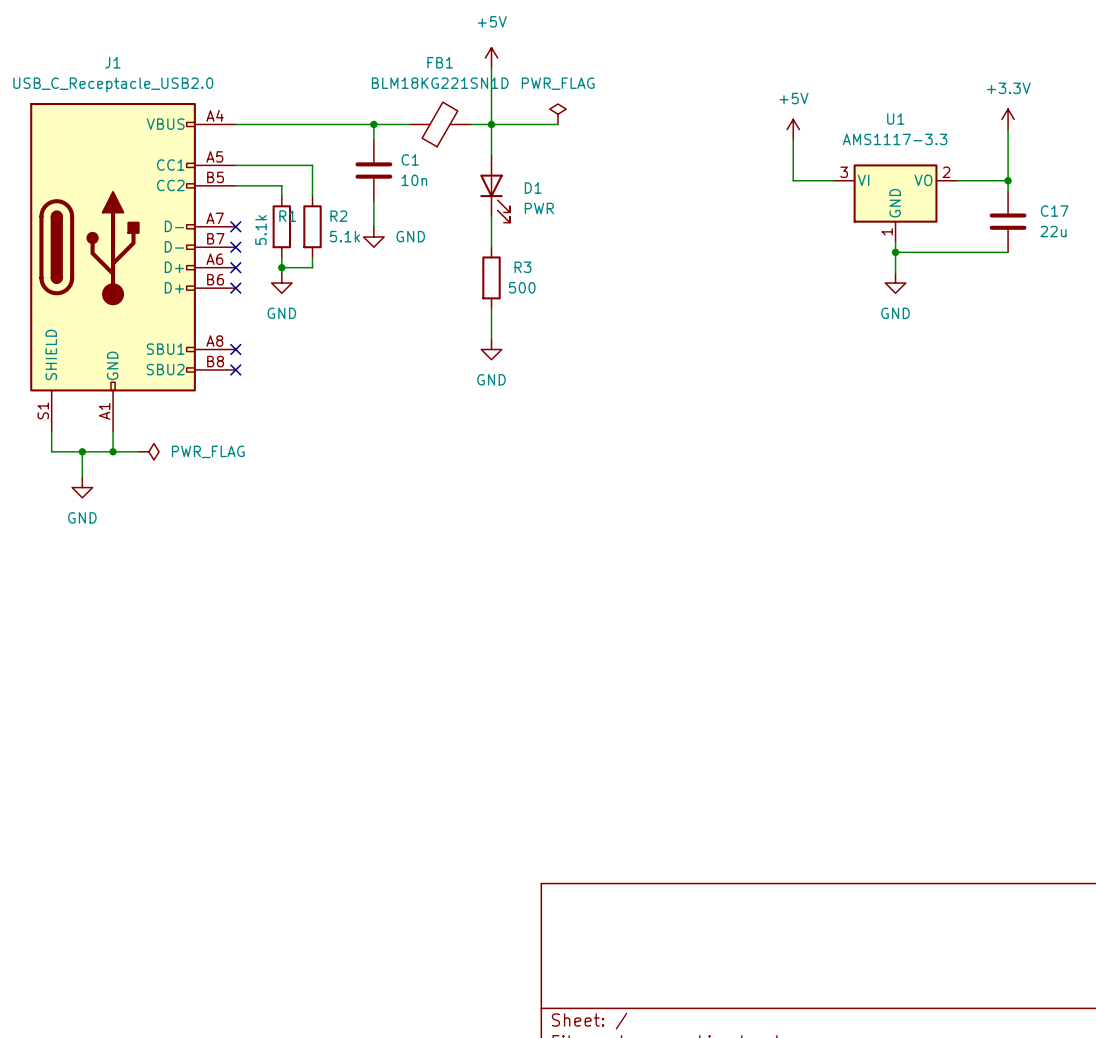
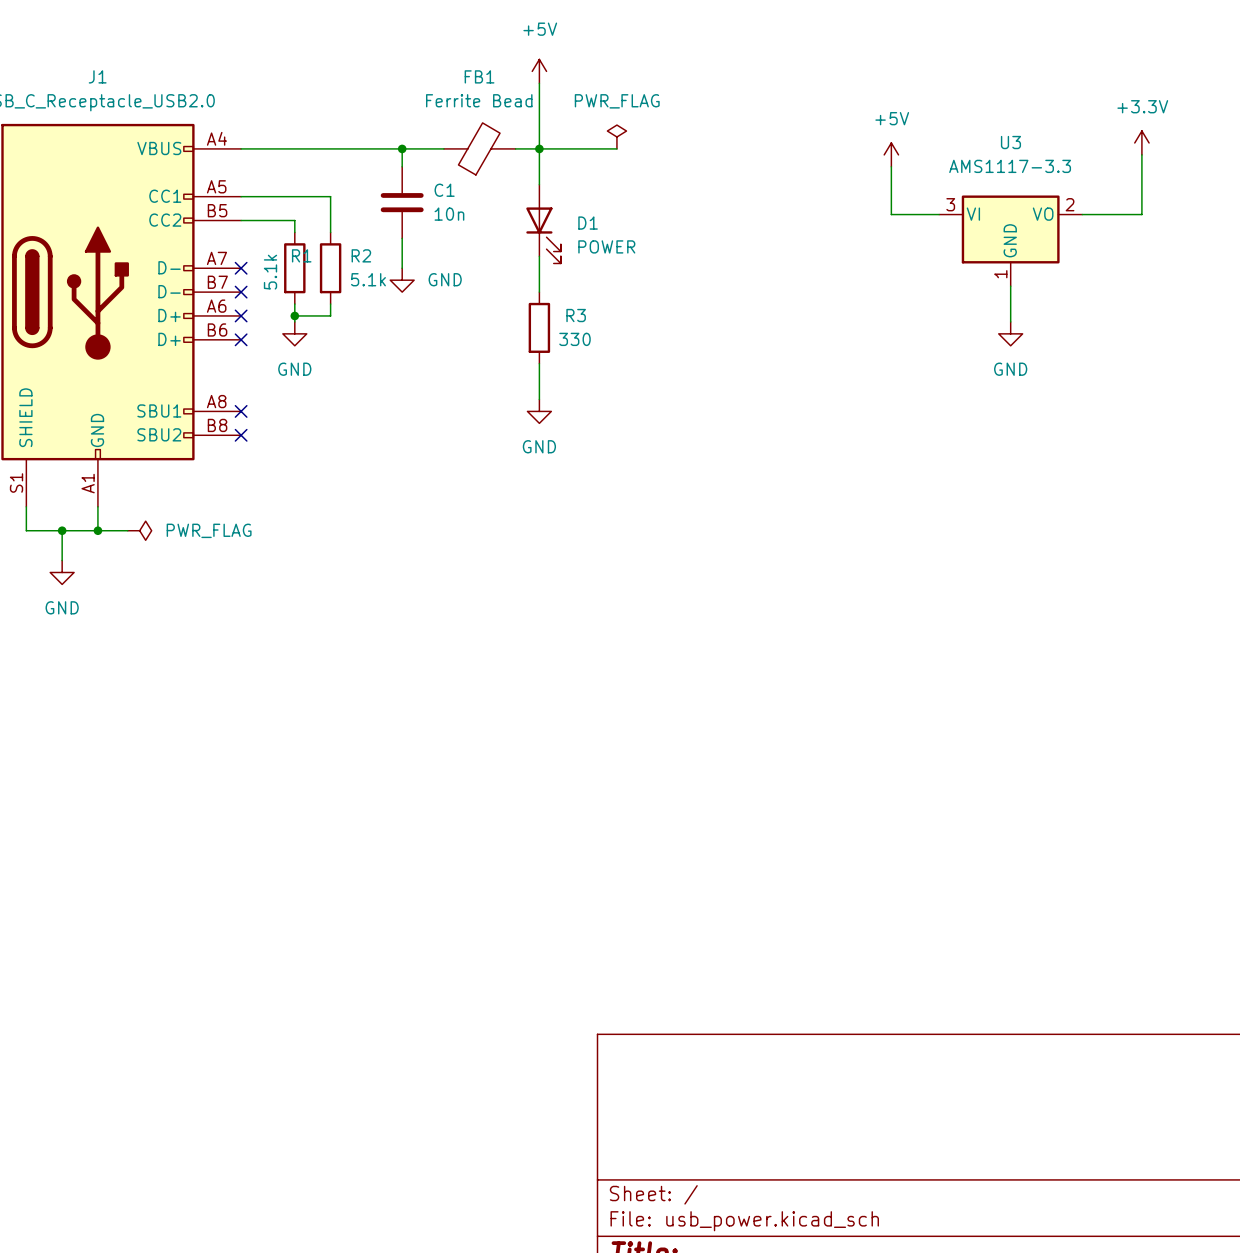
FB1 value: BLM18KG221SN1D (440, 83) -> Ferrite Bead (479, 100)
U1 name: U1 (895, 118) -> U3 (1010, 142)
wire: (1008, 180) (1008, 190) -> none
junction: (1008, 180) -> none
D1 value: PWR (539, 208) -> POWER (606, 246)
C17: 22u (1008, 221) -> none
wire: (895, 252) (1008, 252) -> none
junction: (895, 252) -> none
R3 value: 500 (522, 287) -> 330 (574, 339)

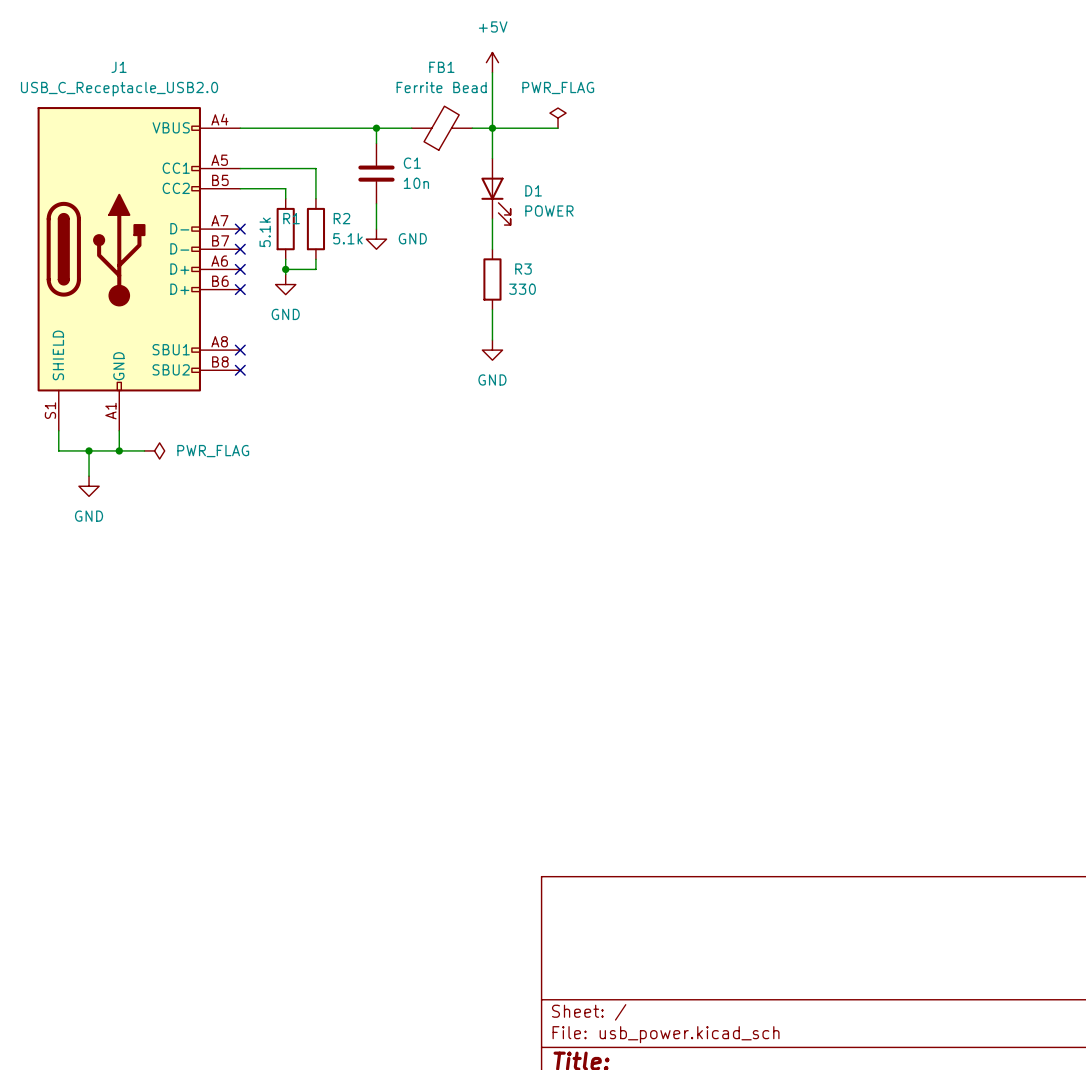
power symbol: +3.3V (1141, 142) -> none
power symbol: +5V (891, 154) -> none
wire: (1141, 154) (1141, 214) (1082, 214) -> none
wire: (891, 166) (891, 214) (939, 214) -> none
U3: AMS1117-3.3 (1010, 240) -> none
wire: (1010, 286) (1010, 321) -> none
power symbol: GND (1010, 333) -> none

